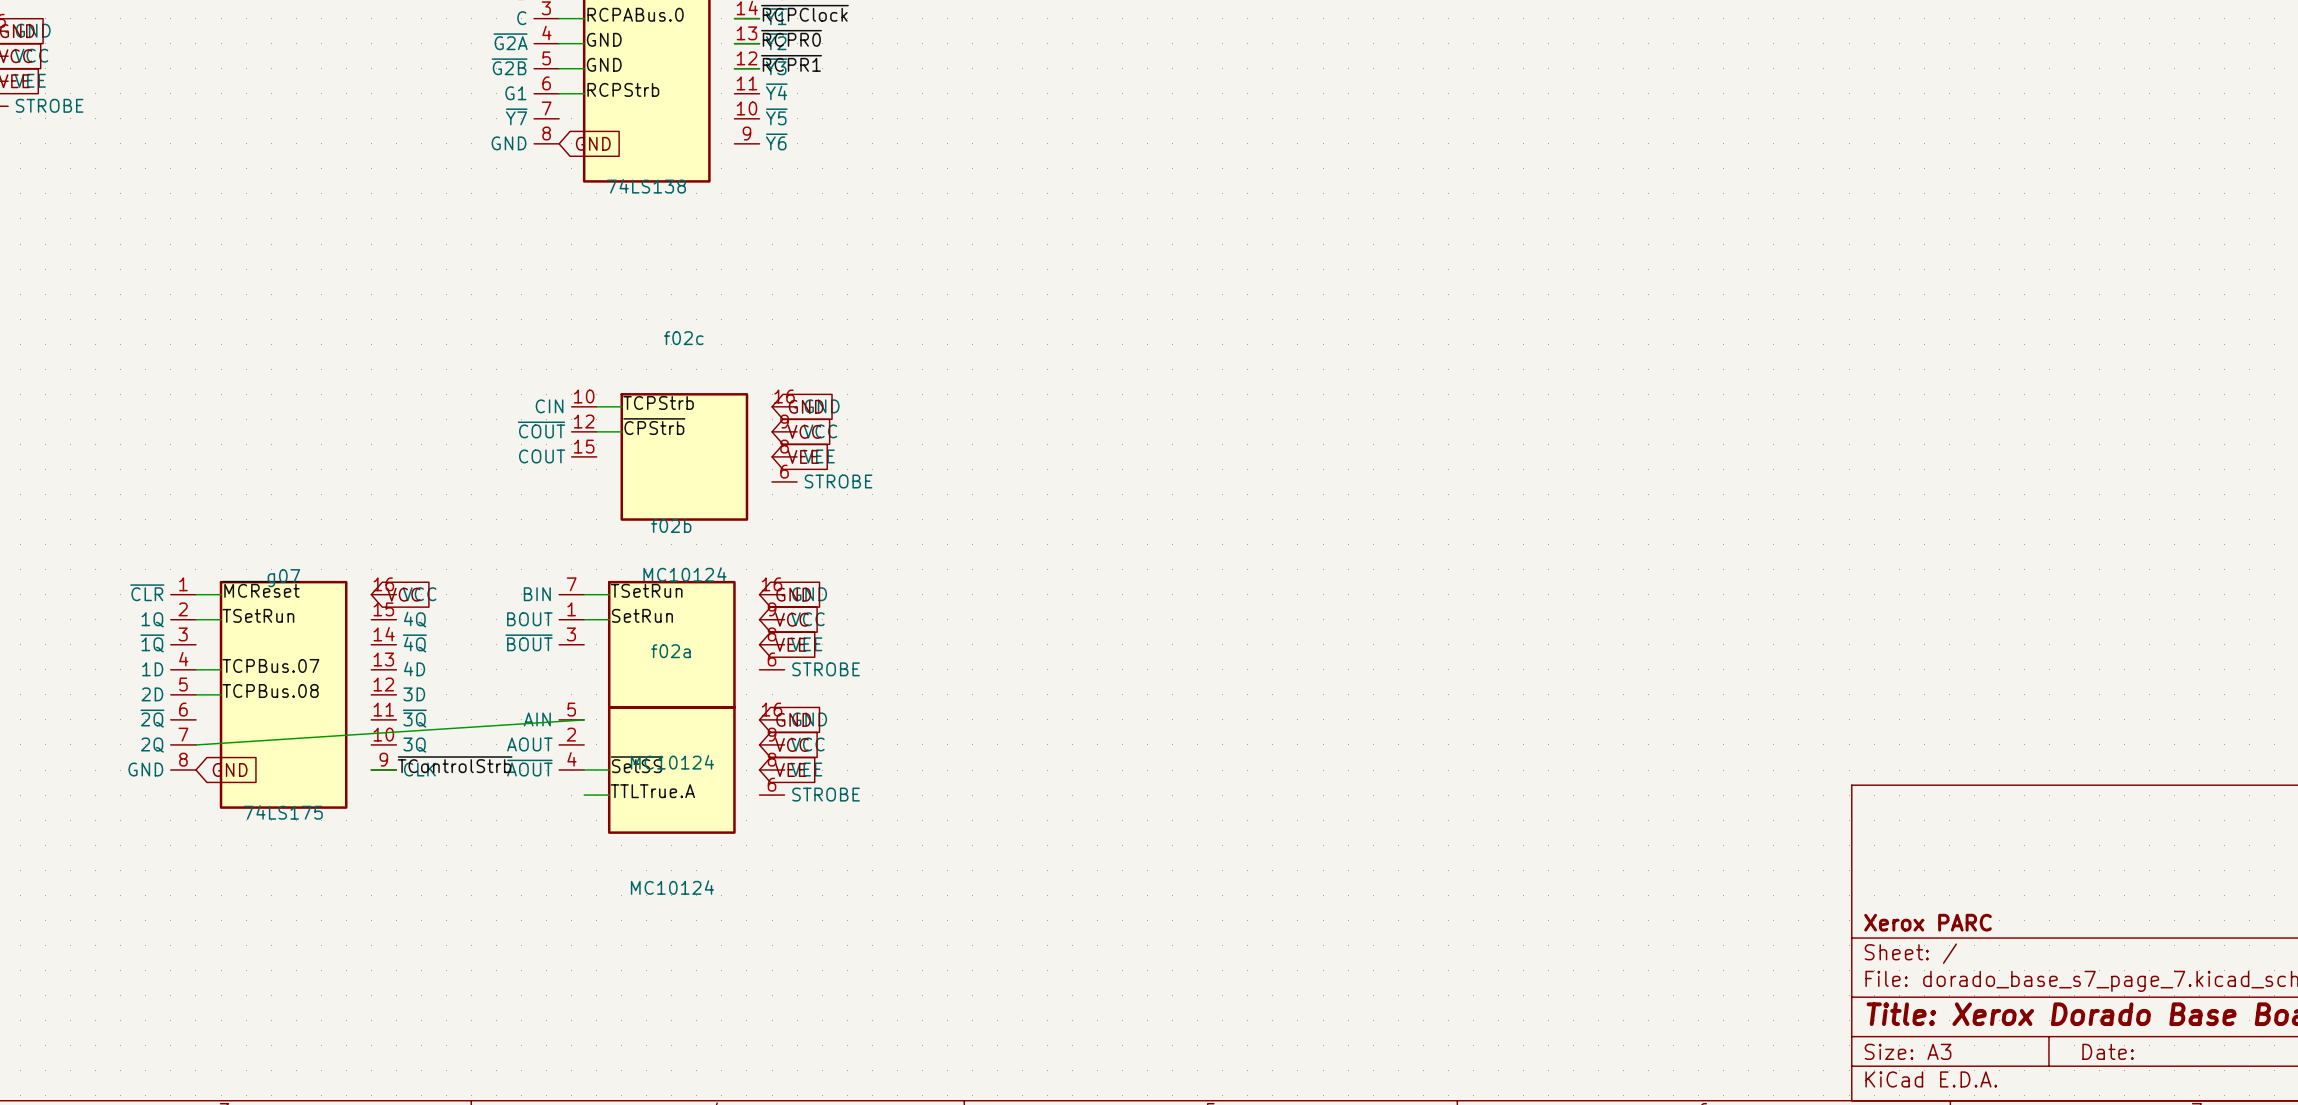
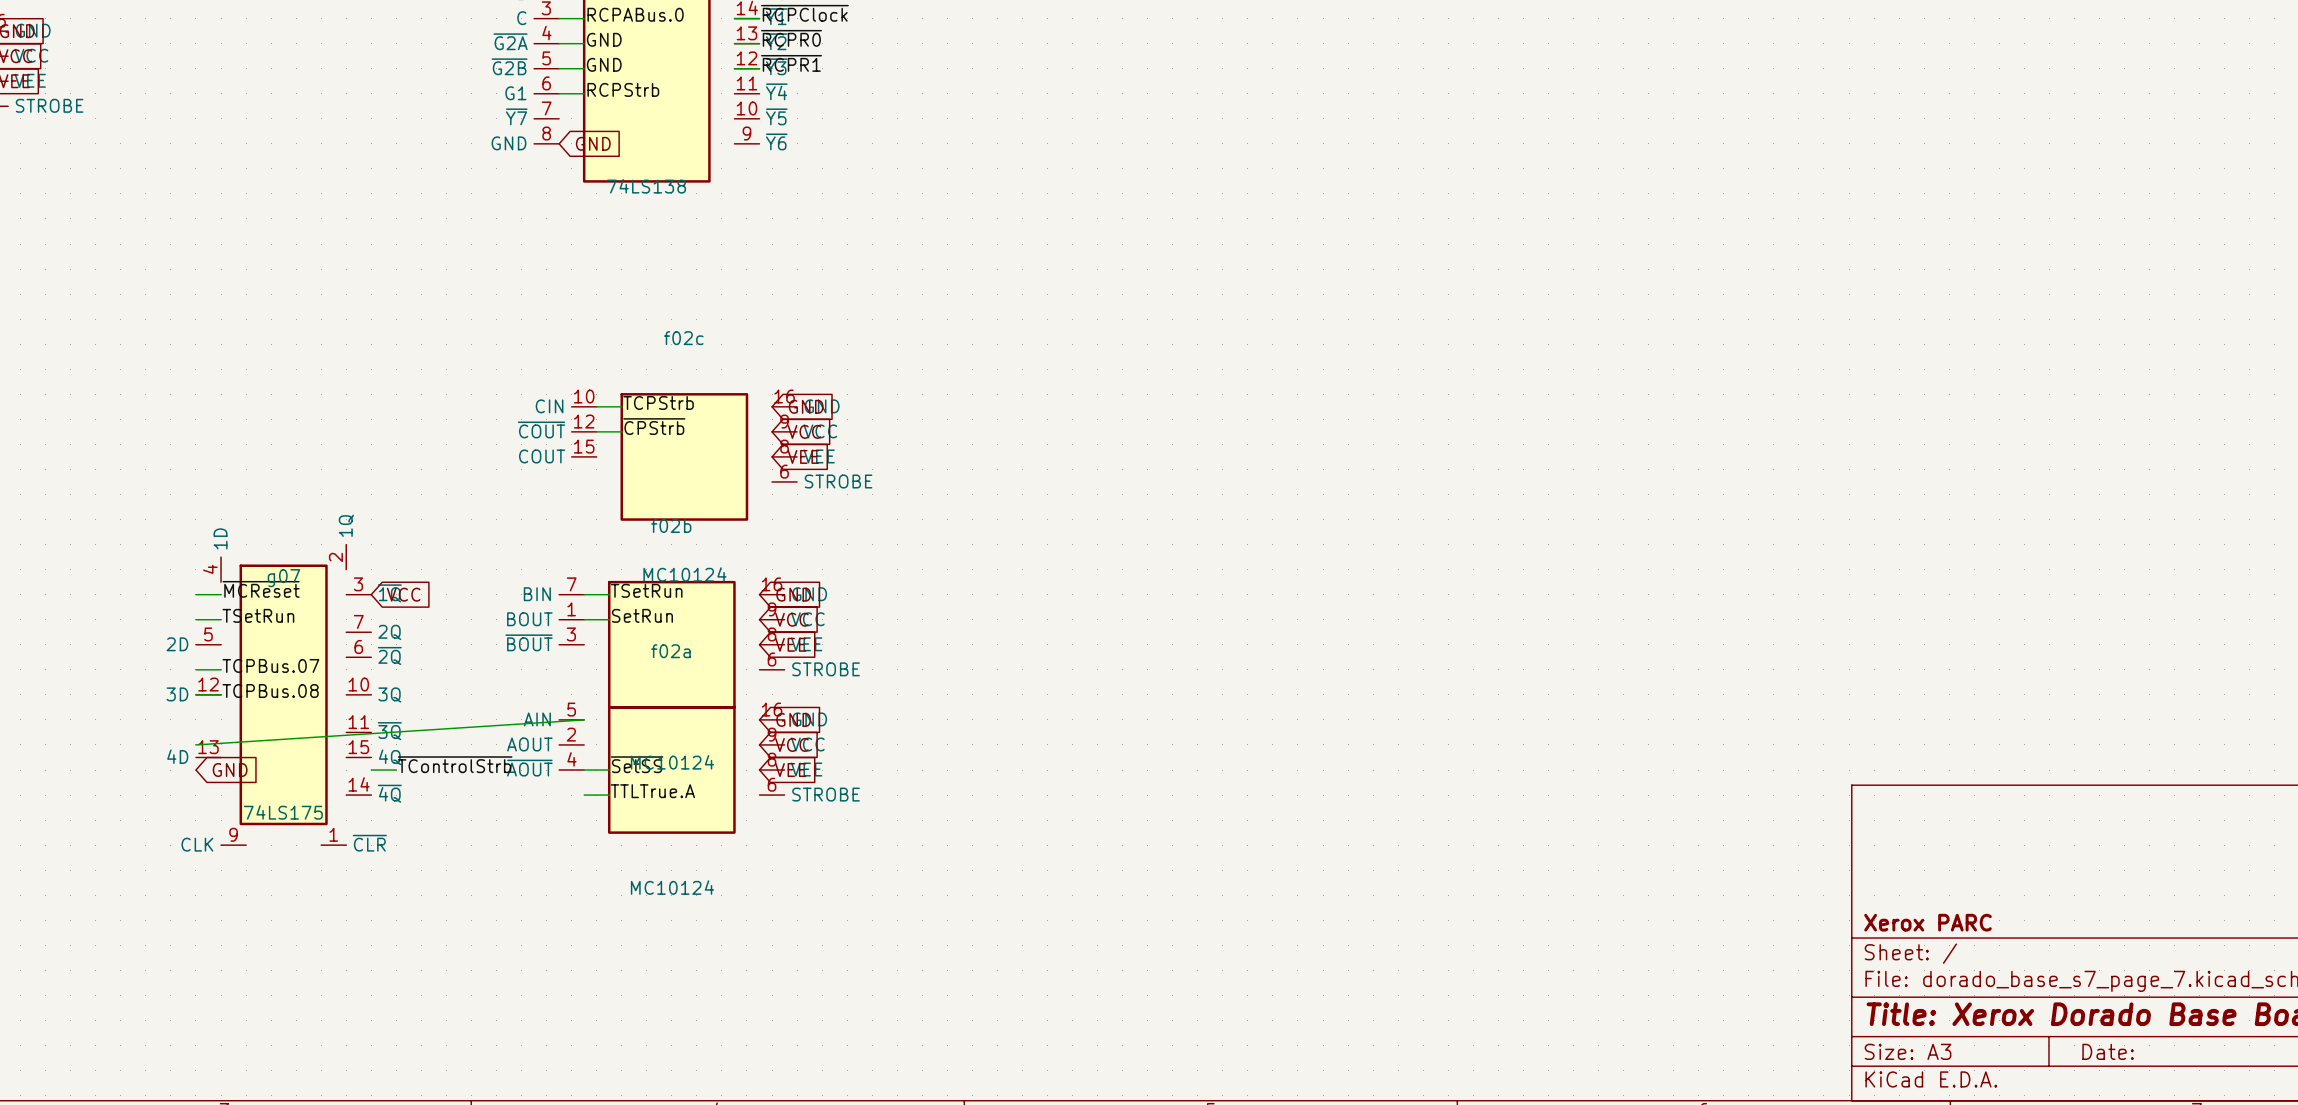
g07 symbol: [170, 580, 397, 809] -> [195, 544, 372, 846]

